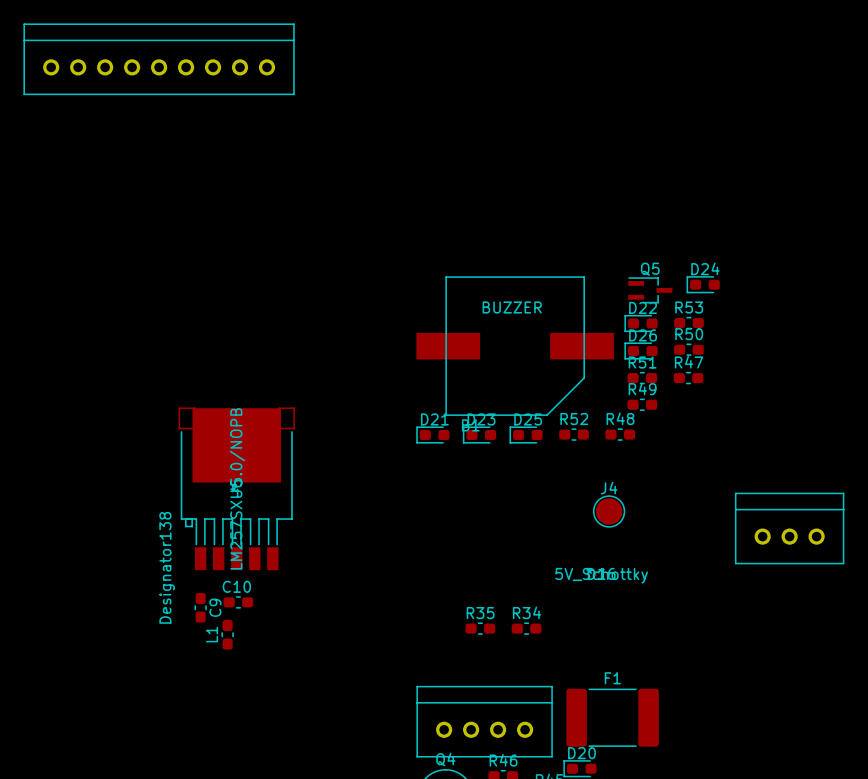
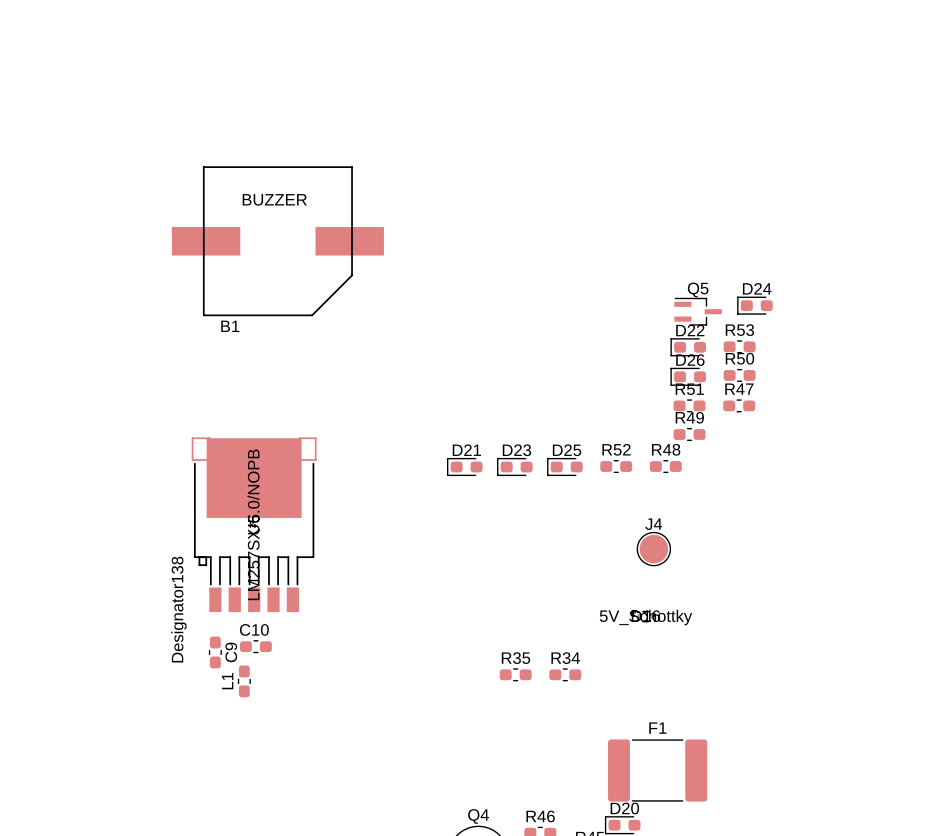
part: (159, 59) -> none
B1 position: (515, 346) -> (277, 241)
part: (789, 528) -> none
part: (484, 721) -> none

